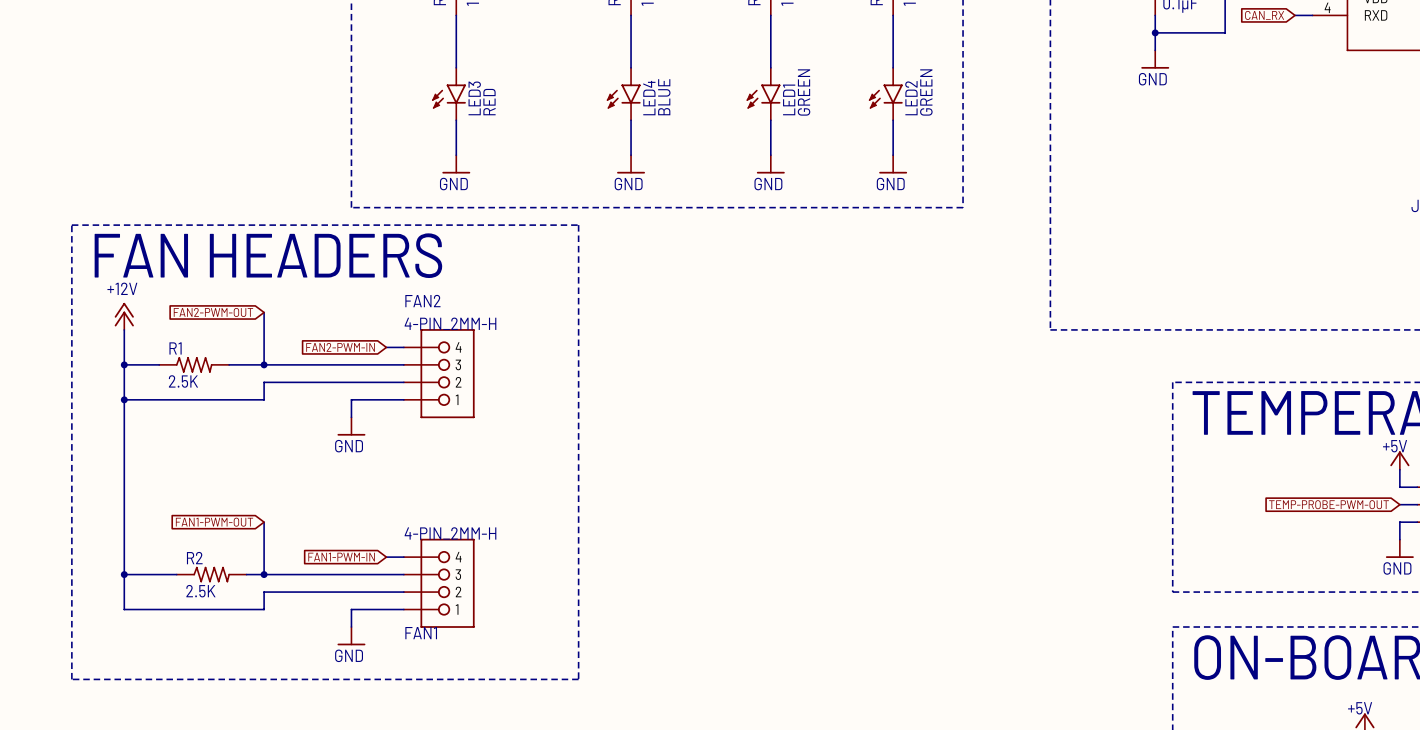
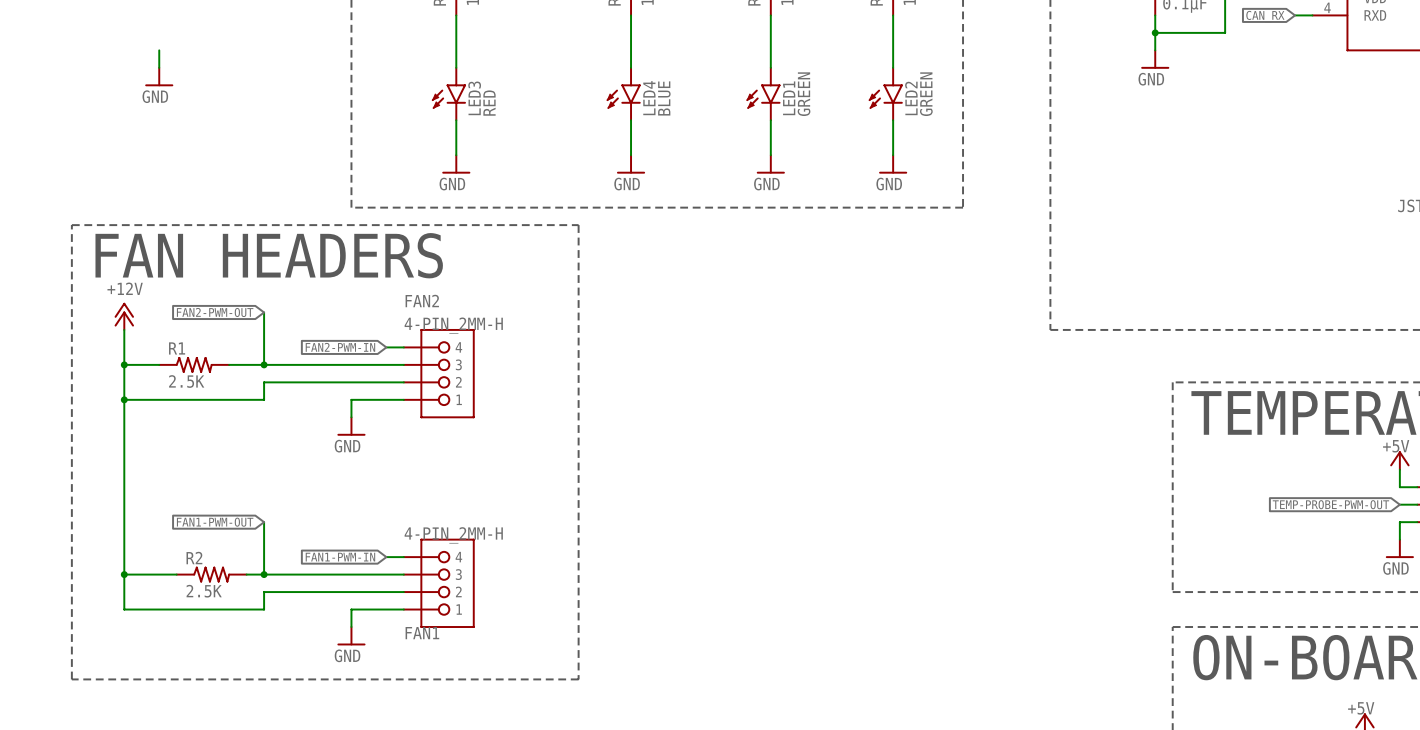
wire: none -> (159, 50) (159, 67)
power symbol: none -> GND (159, 77)

